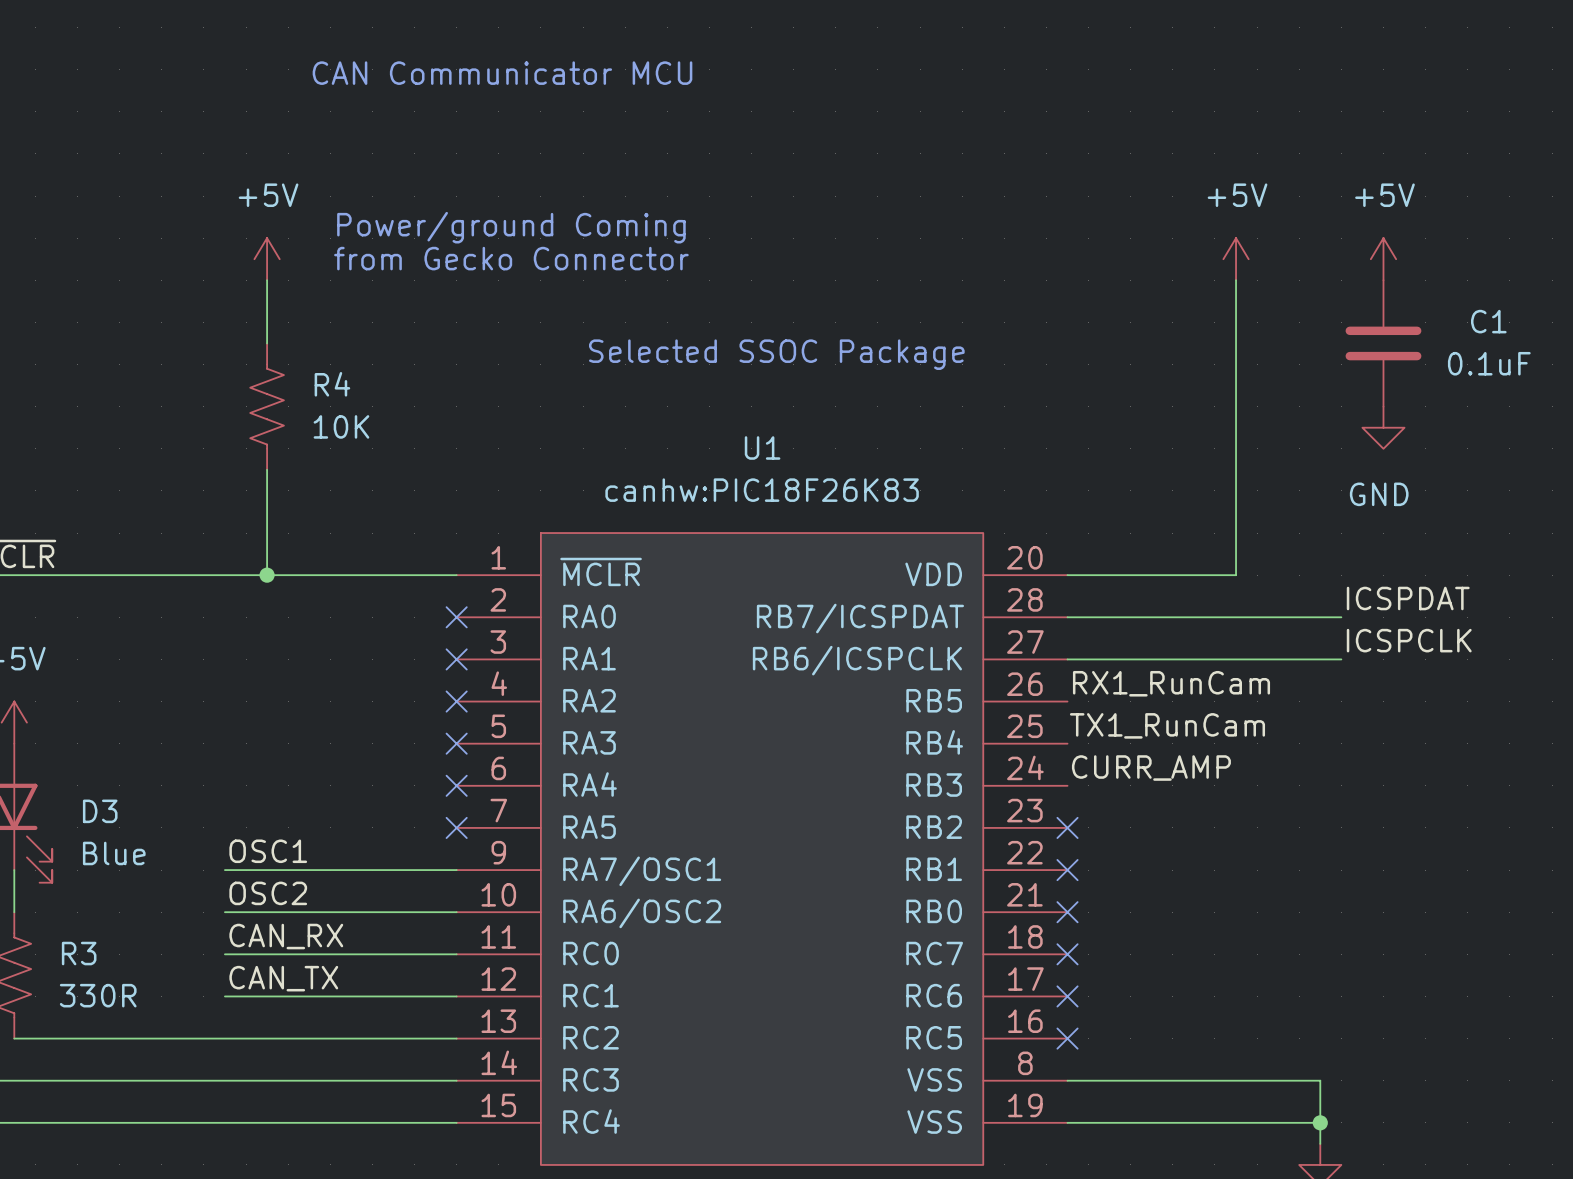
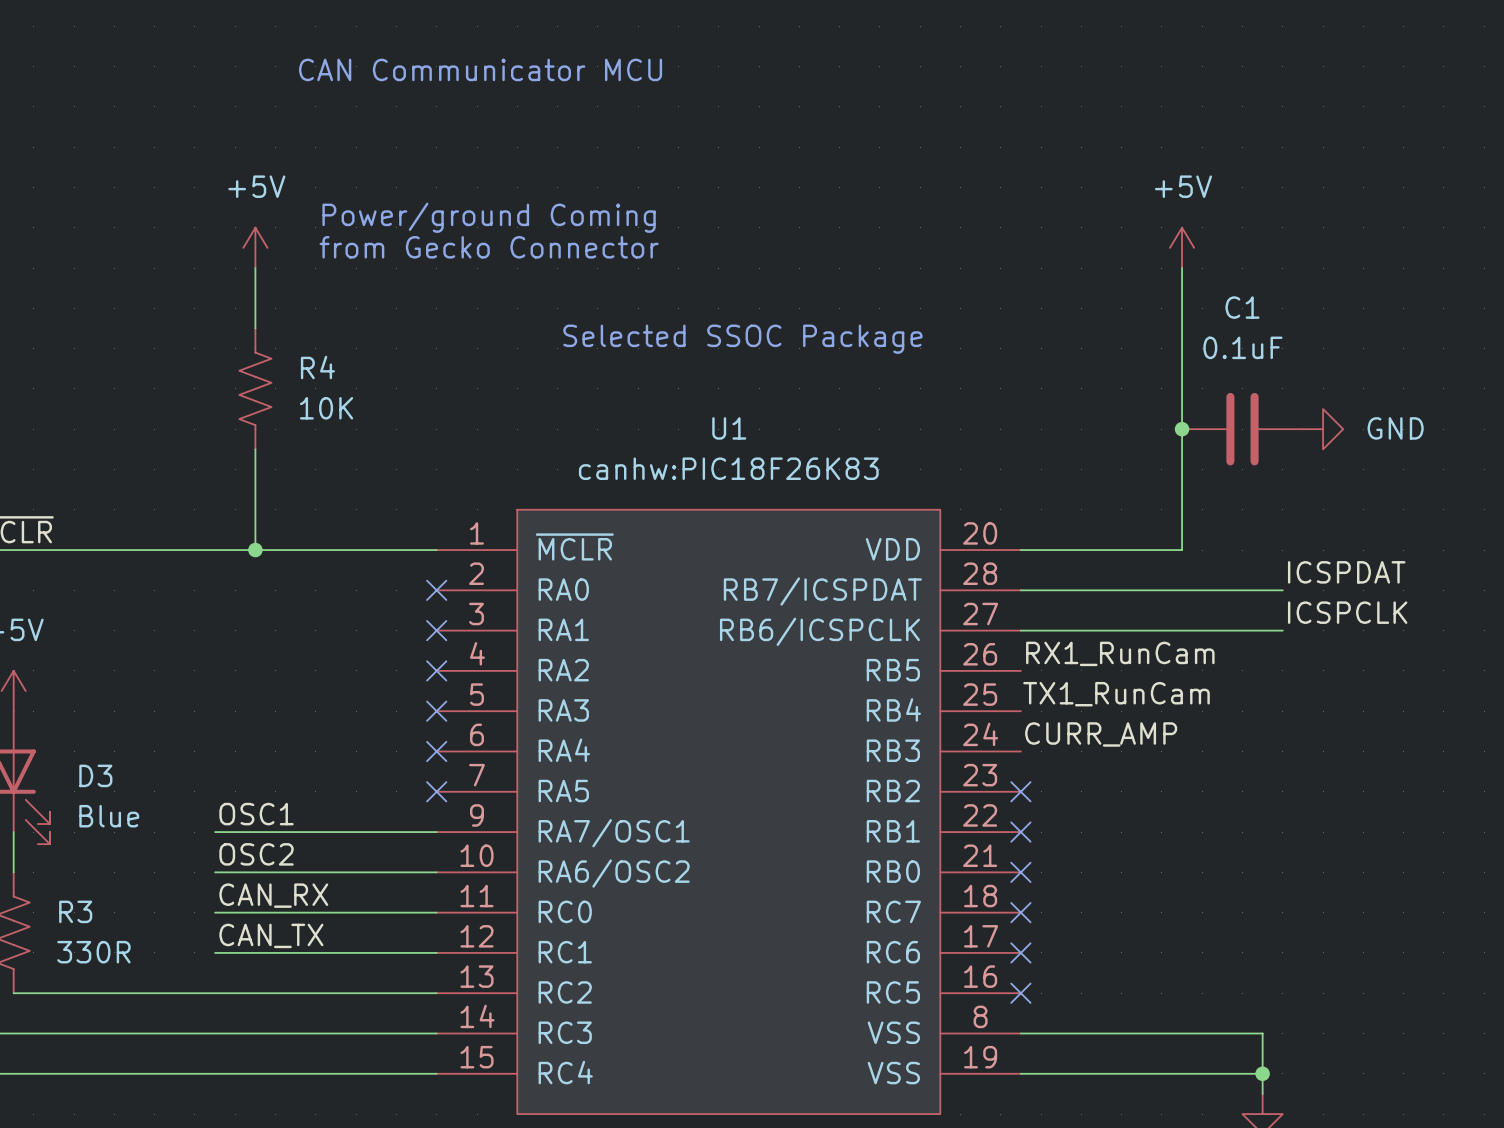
power symbol: +5V (1383, 259) -> none
C1 name position: C1 (1488, 321) -> C1 (1242, 307)
C1 rotation: 0° (1383, 343) -> 90° clockwise (1242, 429)
C1 position: (1383, 343) -> (1242, 429)
C1 value position: 0.1uF (1489, 363) -> 0.1uF (1242, 347)
power symbol rotation: 0° (1383, 427) -> 90° counterclockwise (1323, 429)
junction: none -> (1182, 429)

